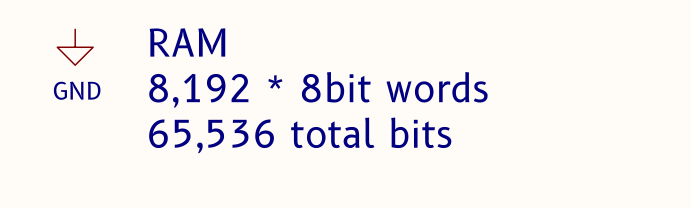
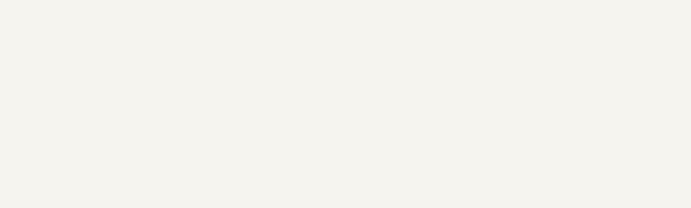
text: RAM (187, 42) -> none
power symbol: GND (75, 47) -> none
text: 8,192 * 8bit words (318, 89) -> none
text: 65,536 total bits (300, 135) -> none

